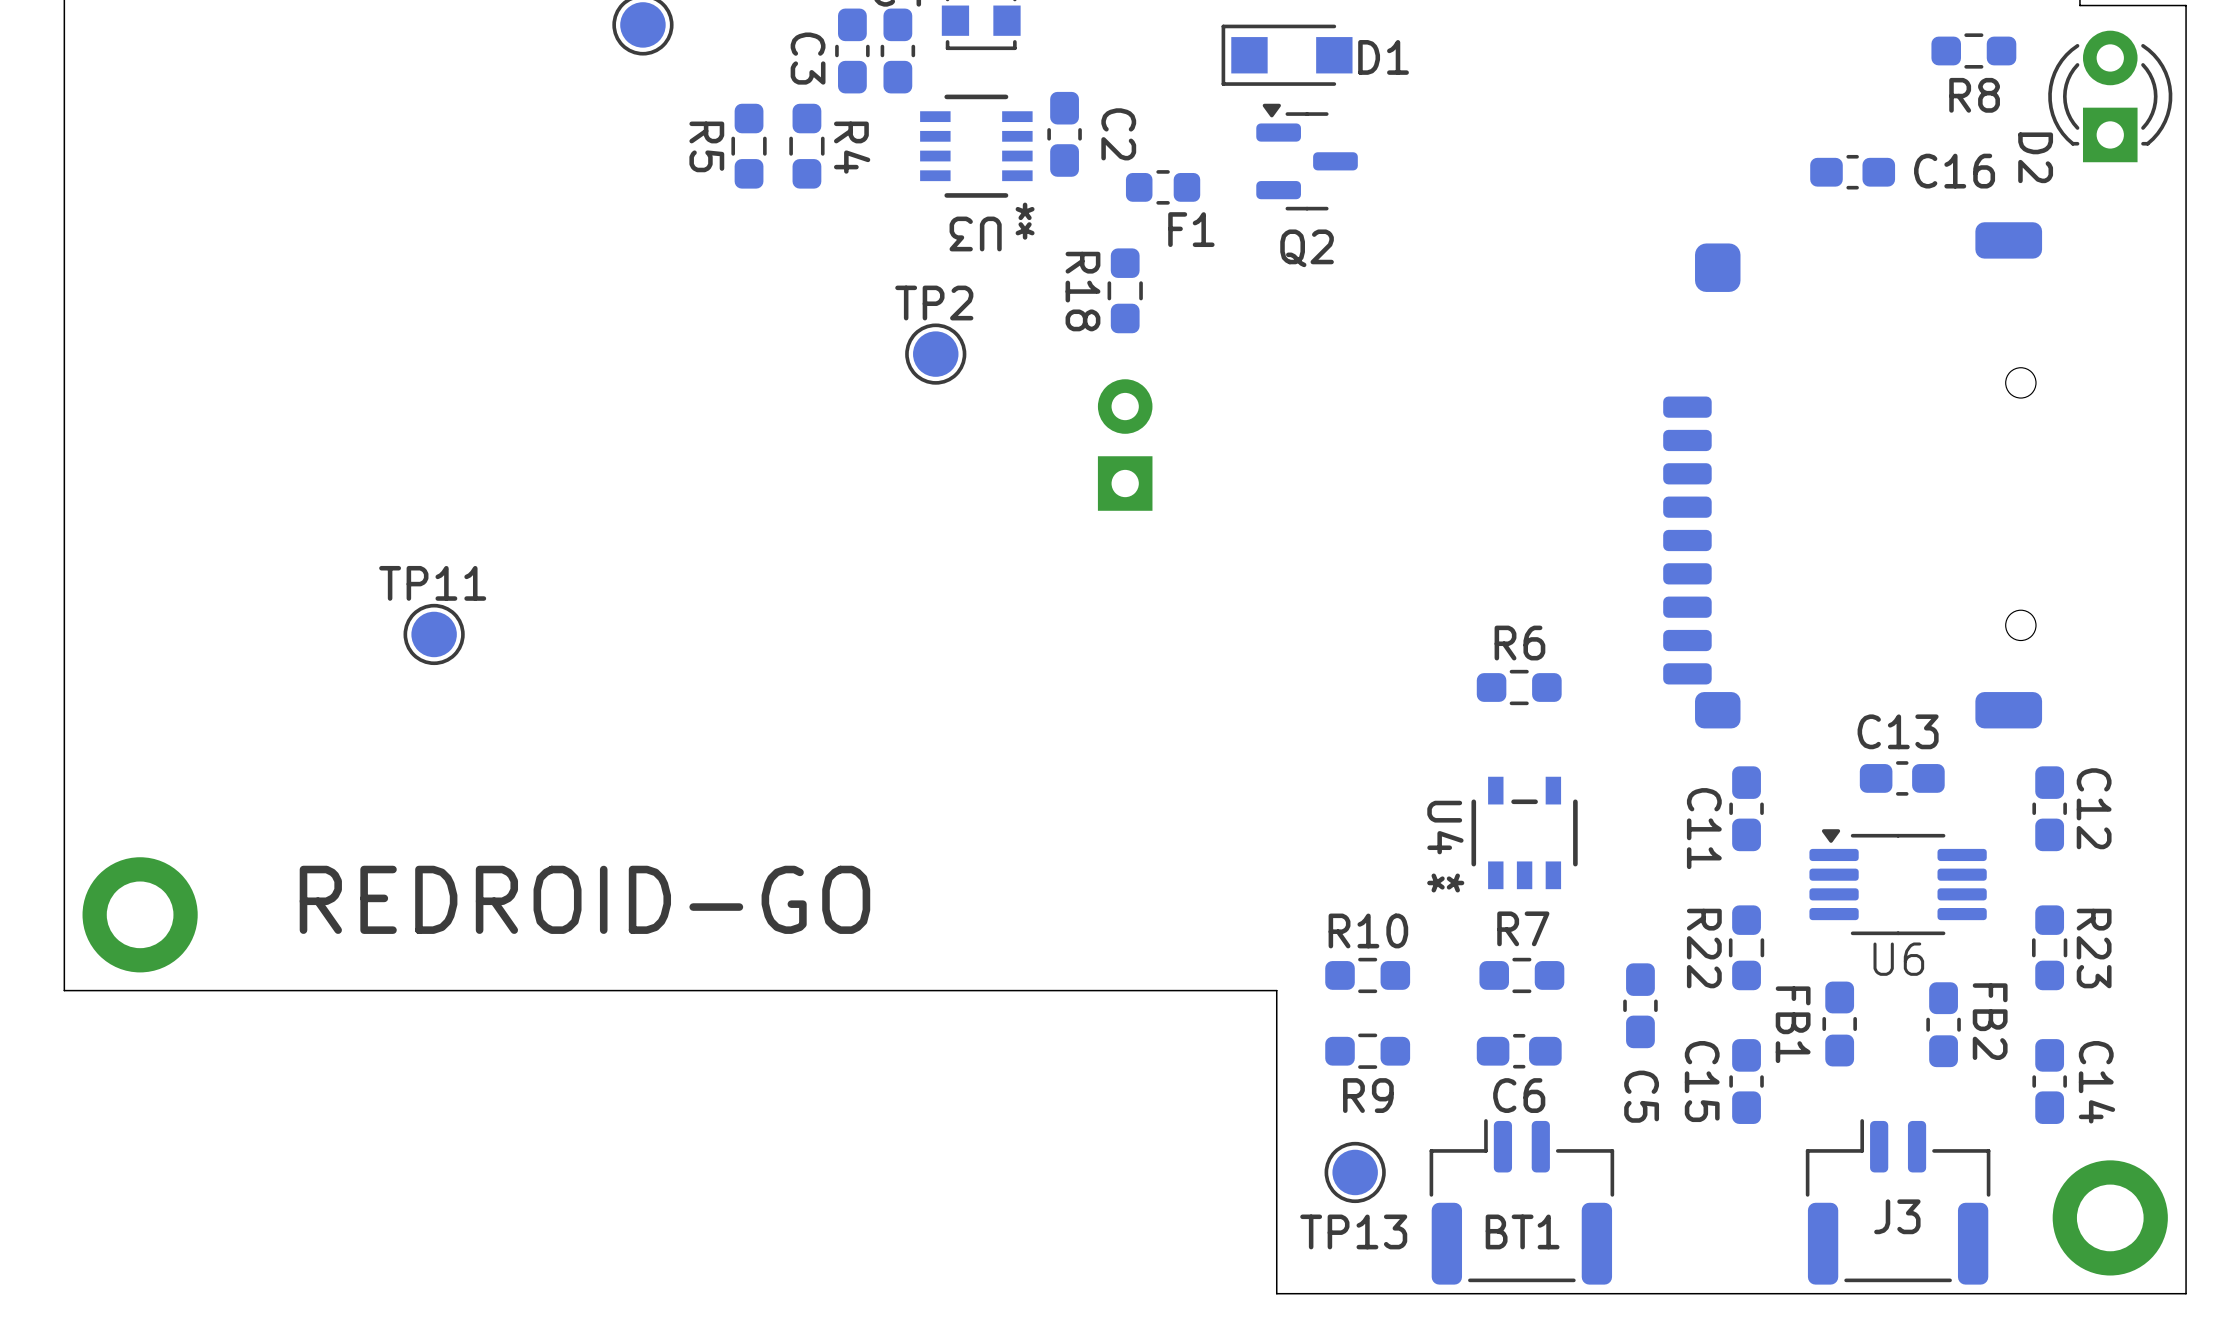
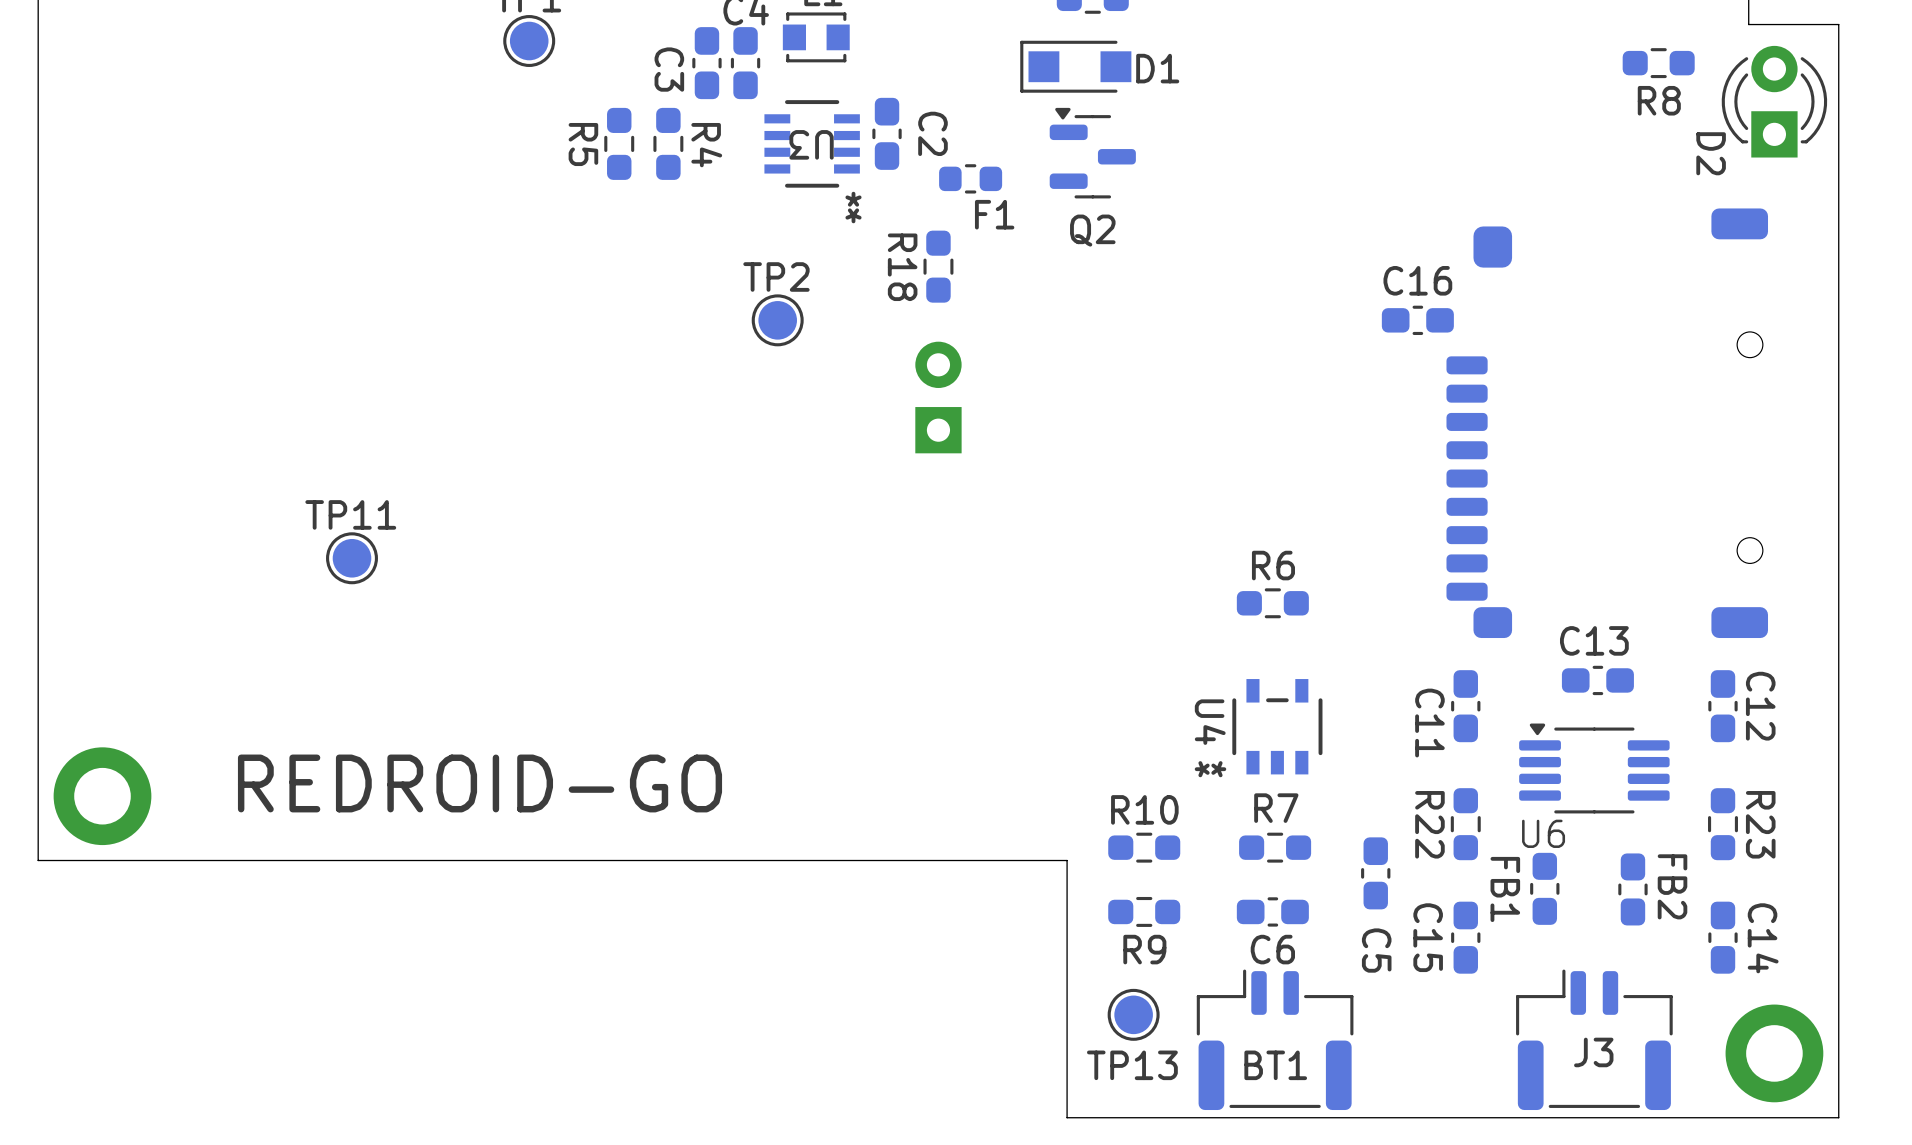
C16 name position: C16 (1954, 171) -> C16 (1417, 280)
C16 position: (1852, 172) -> (1417, 320)
U3 name position: U3 (975, 233) -> U3 (811, 144)
U6 position: (1852, 475) -> (1607, 423)
U6 name position: U6 (1898, 959) -> U6 (1543, 833)

